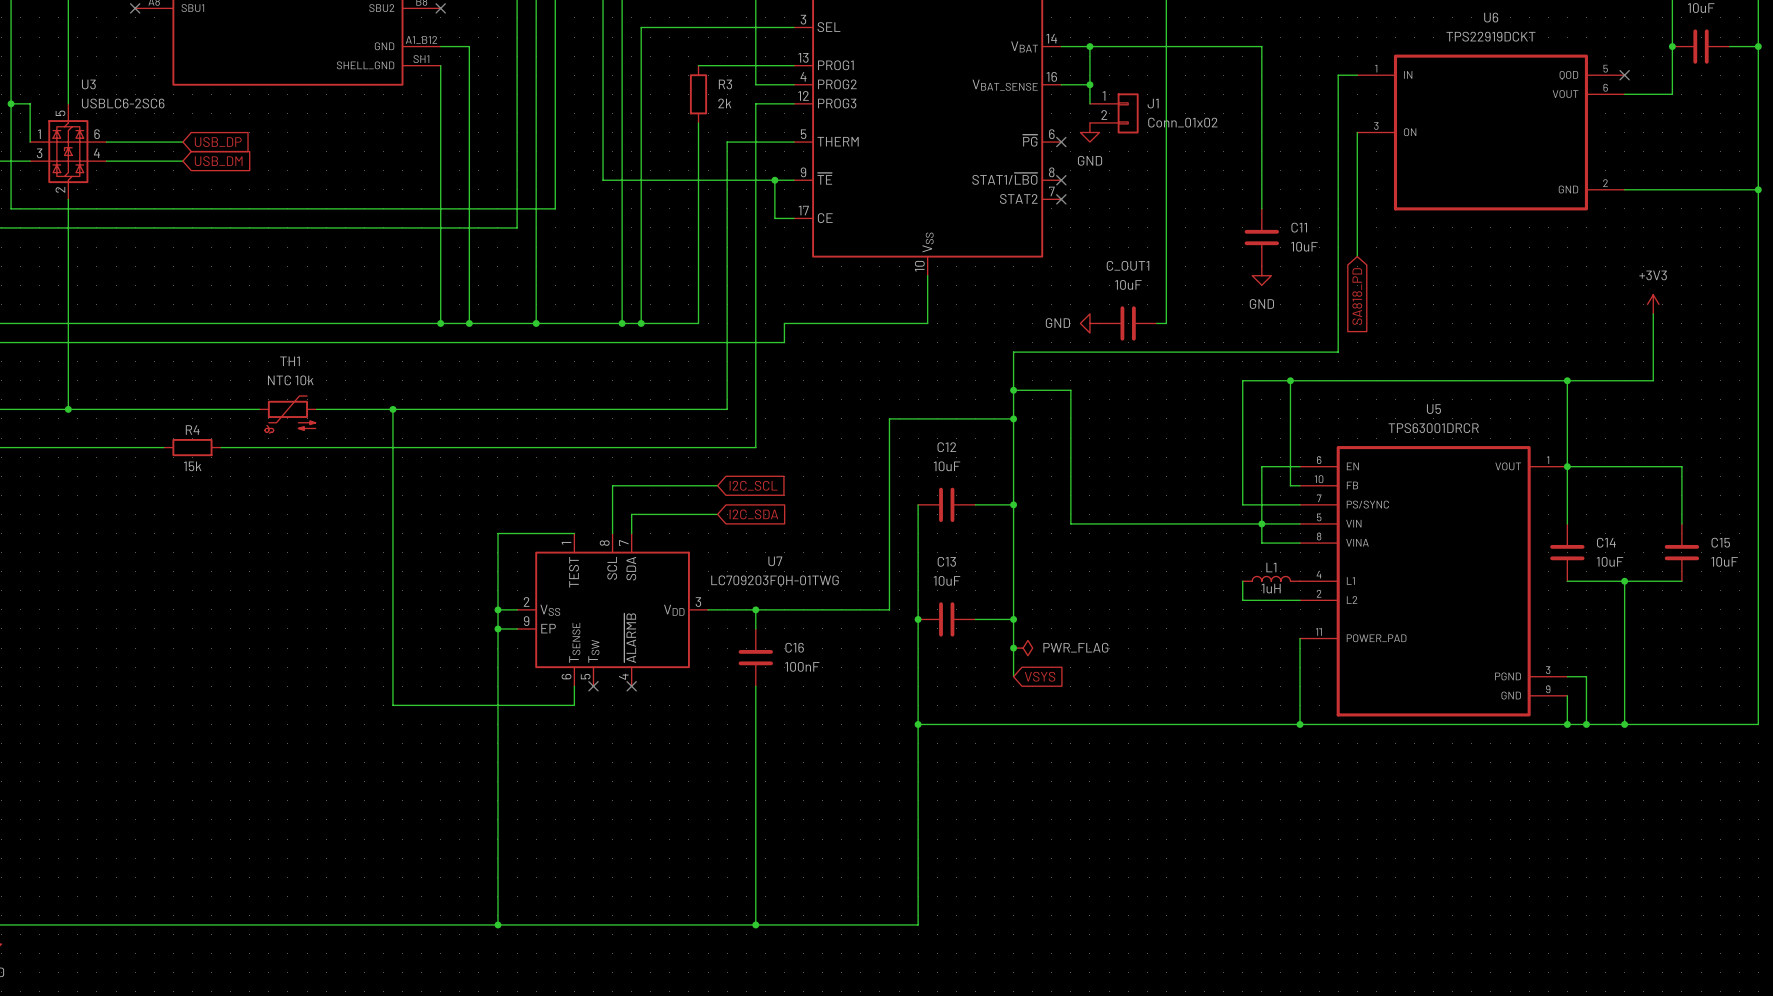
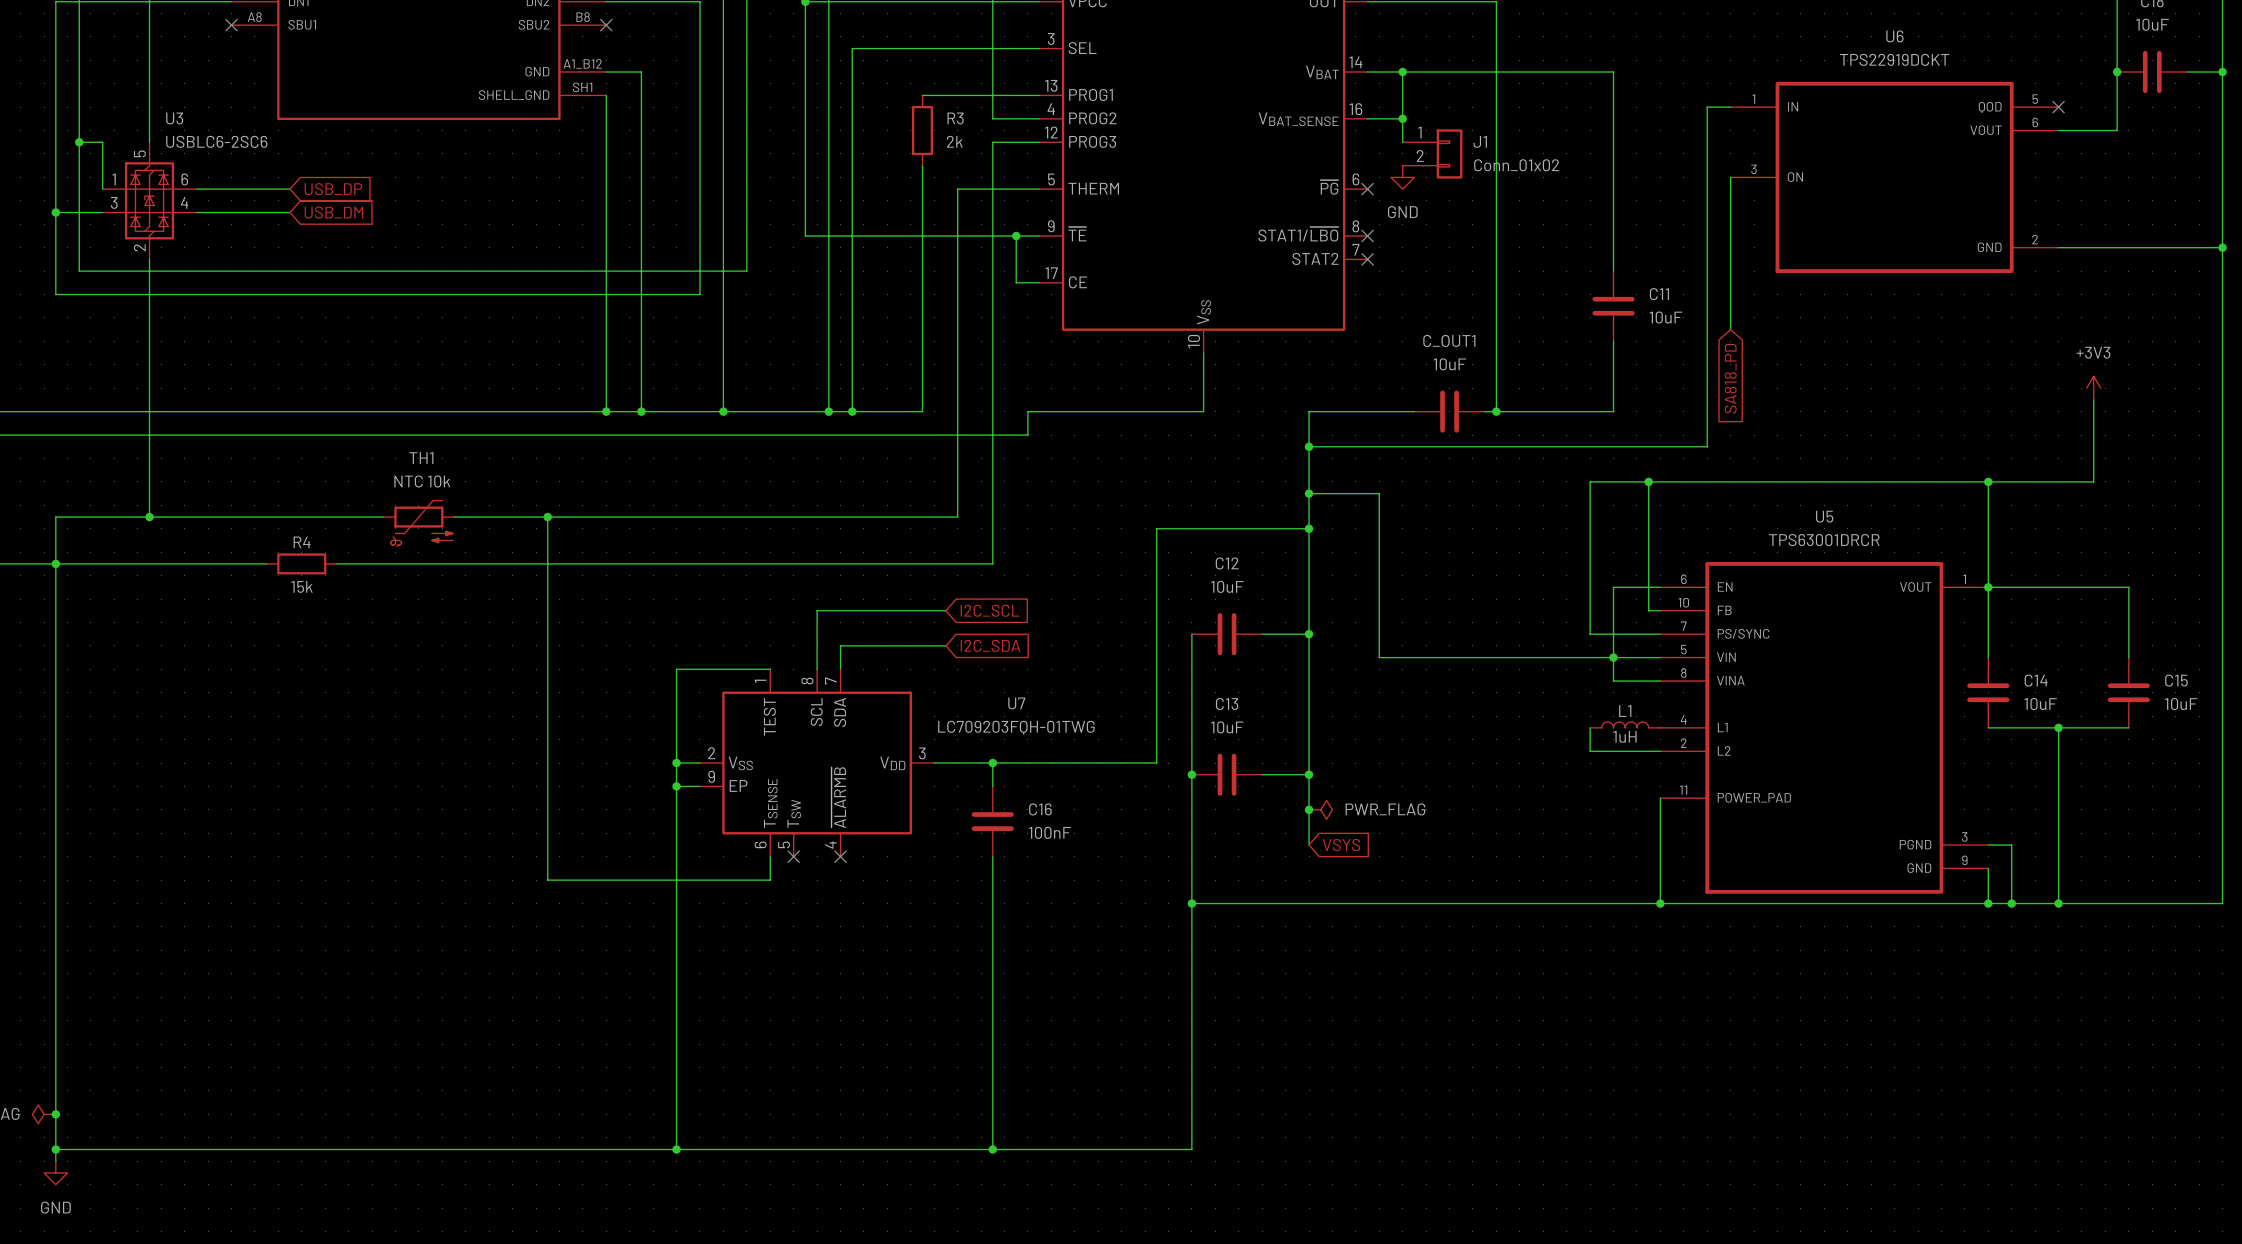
wire: none -> (1613, 341) (1613, 411) (1496, 411)
power symbol: GND (1261, 275) -> none
power symbol: GND (1089, 323) -> none
wire: none -> (1414, 411) (1309, 411) (1309, 446)
junction: none -> (1496, 411)
junction: none -> (1309, 446)

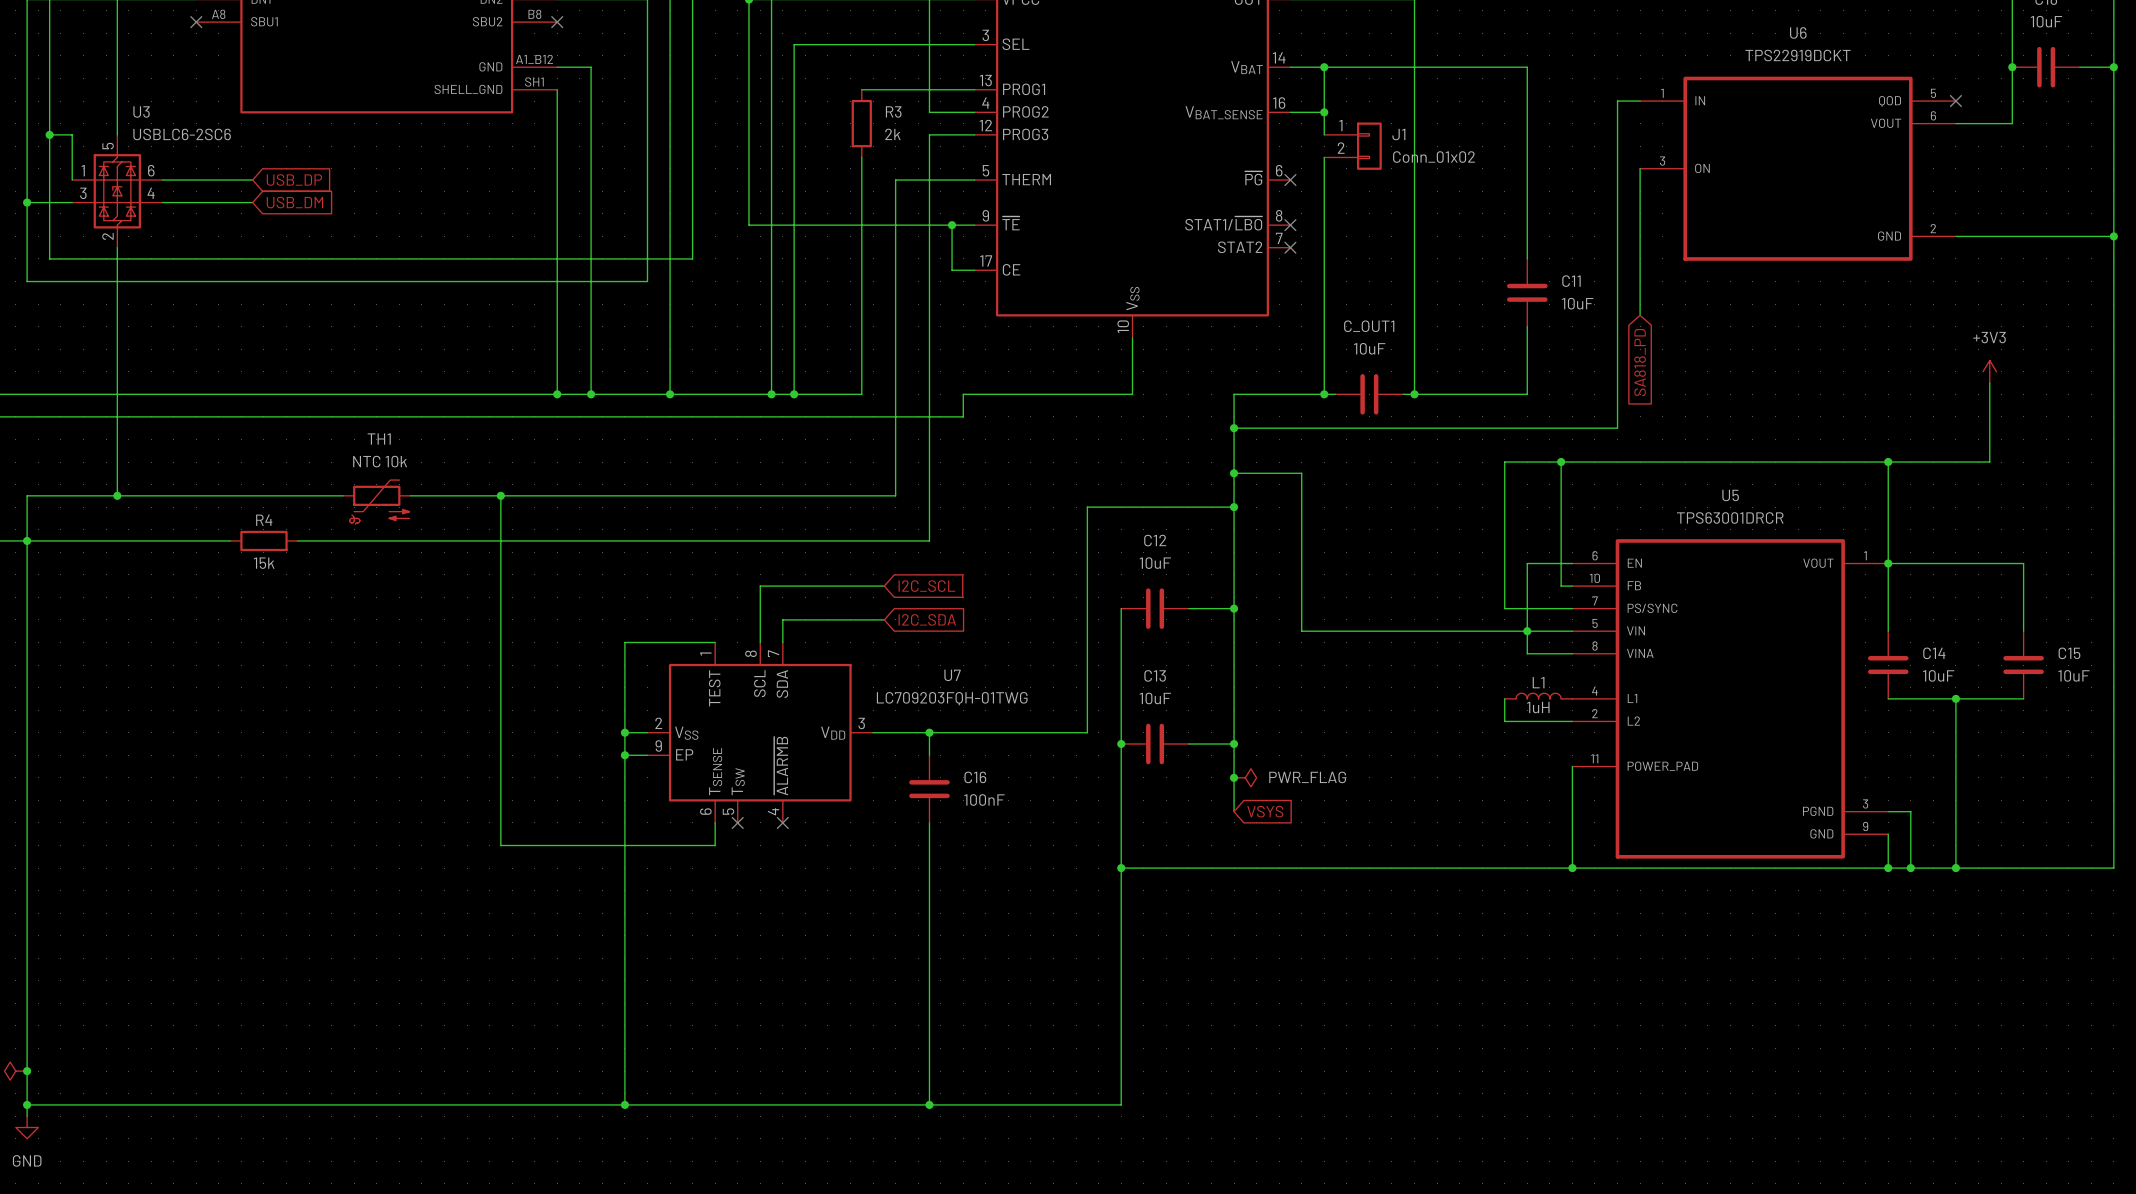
wire: none -> (1324, 157) (1324, 394)
power symbol: GND (1402, 177) -> none
junction: none -> (1324, 394)

